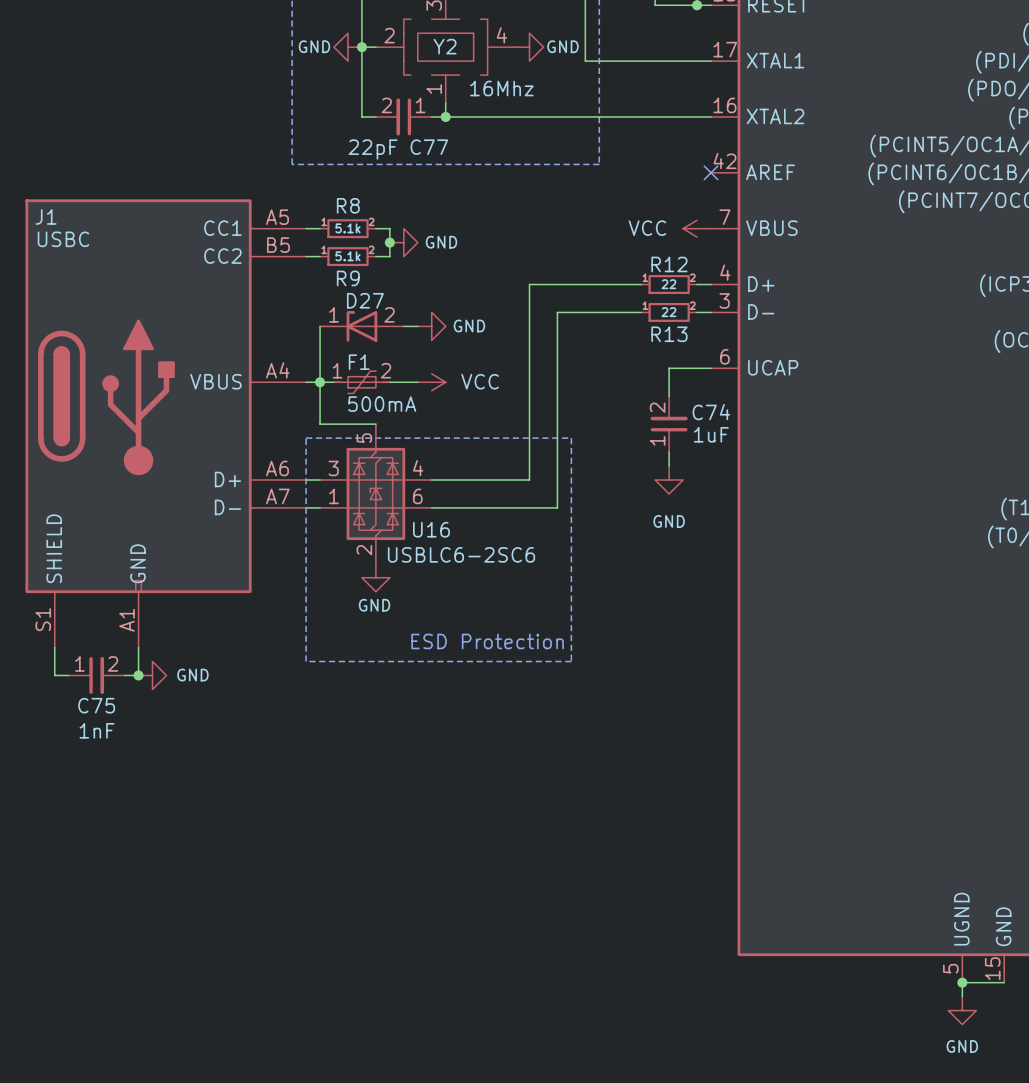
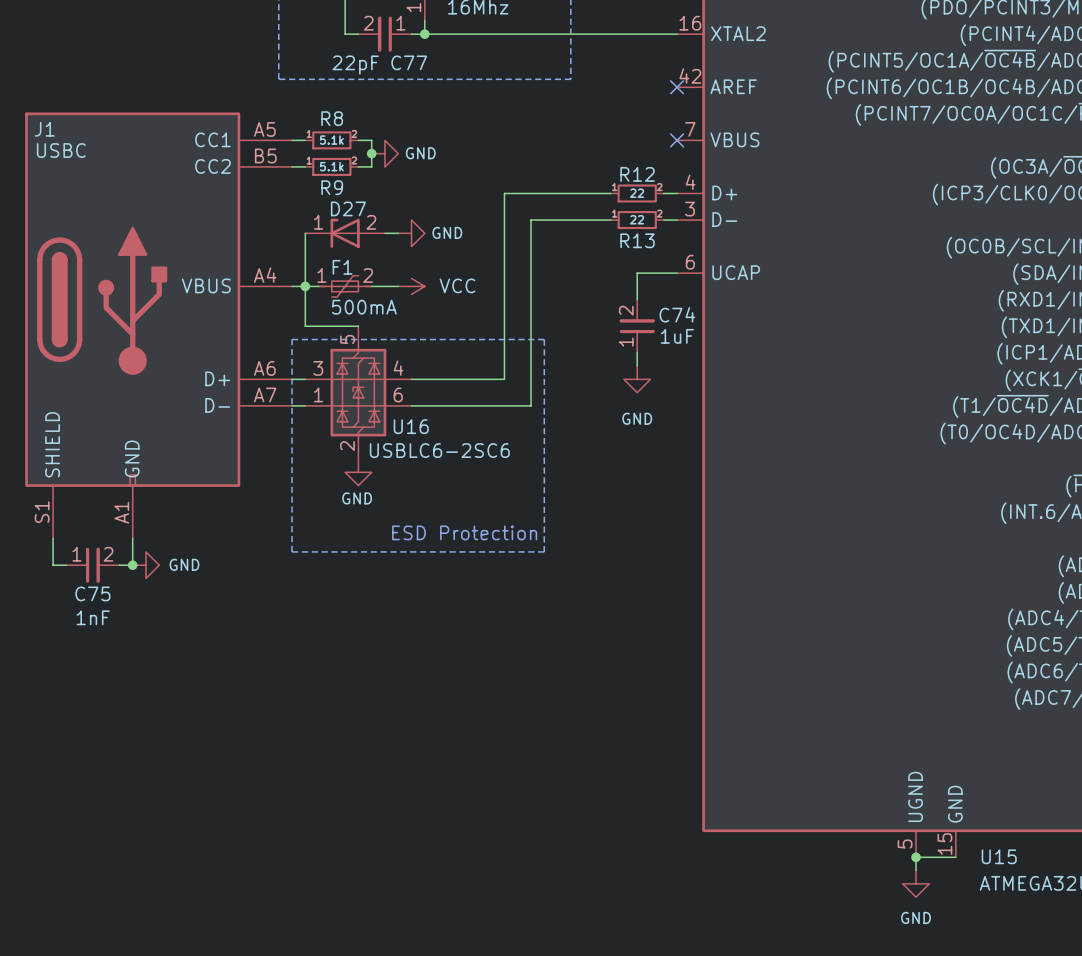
power symbol: VCC (697, 228) -> none
no-connect mark: none -> (677, 140)

